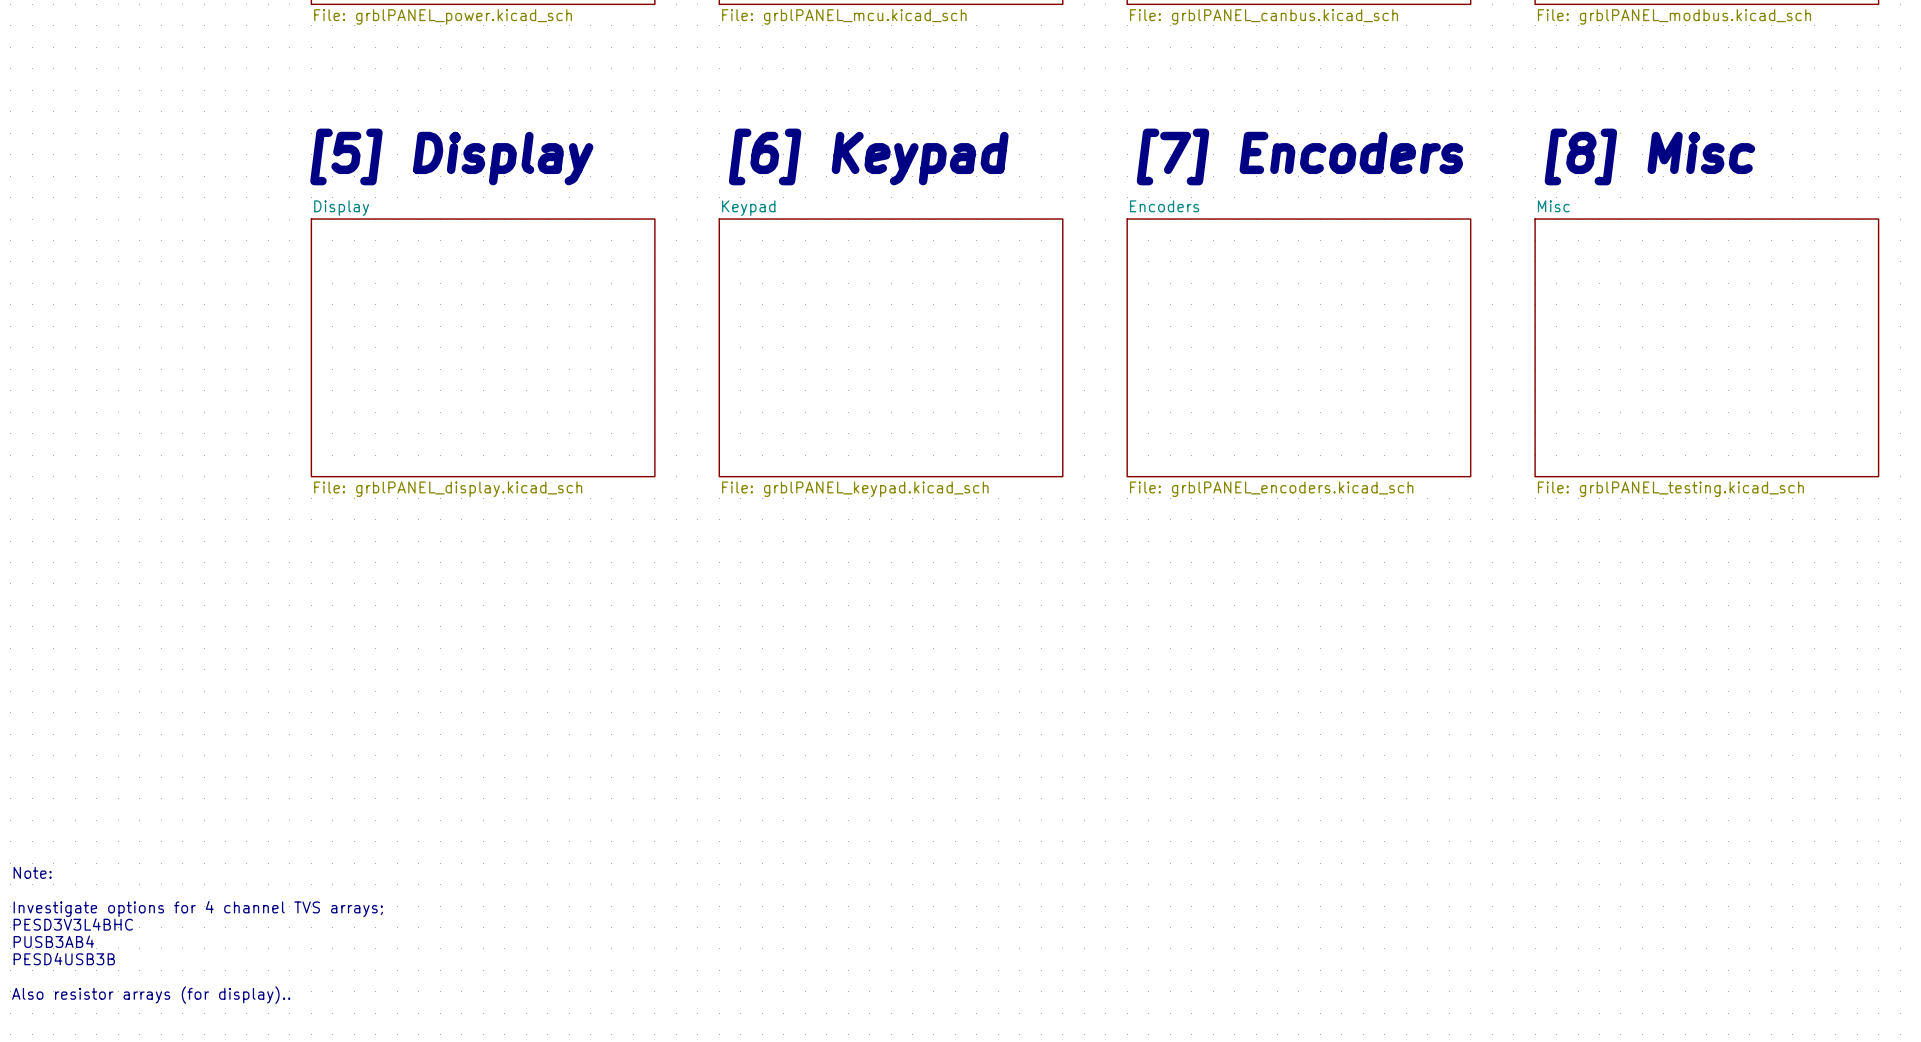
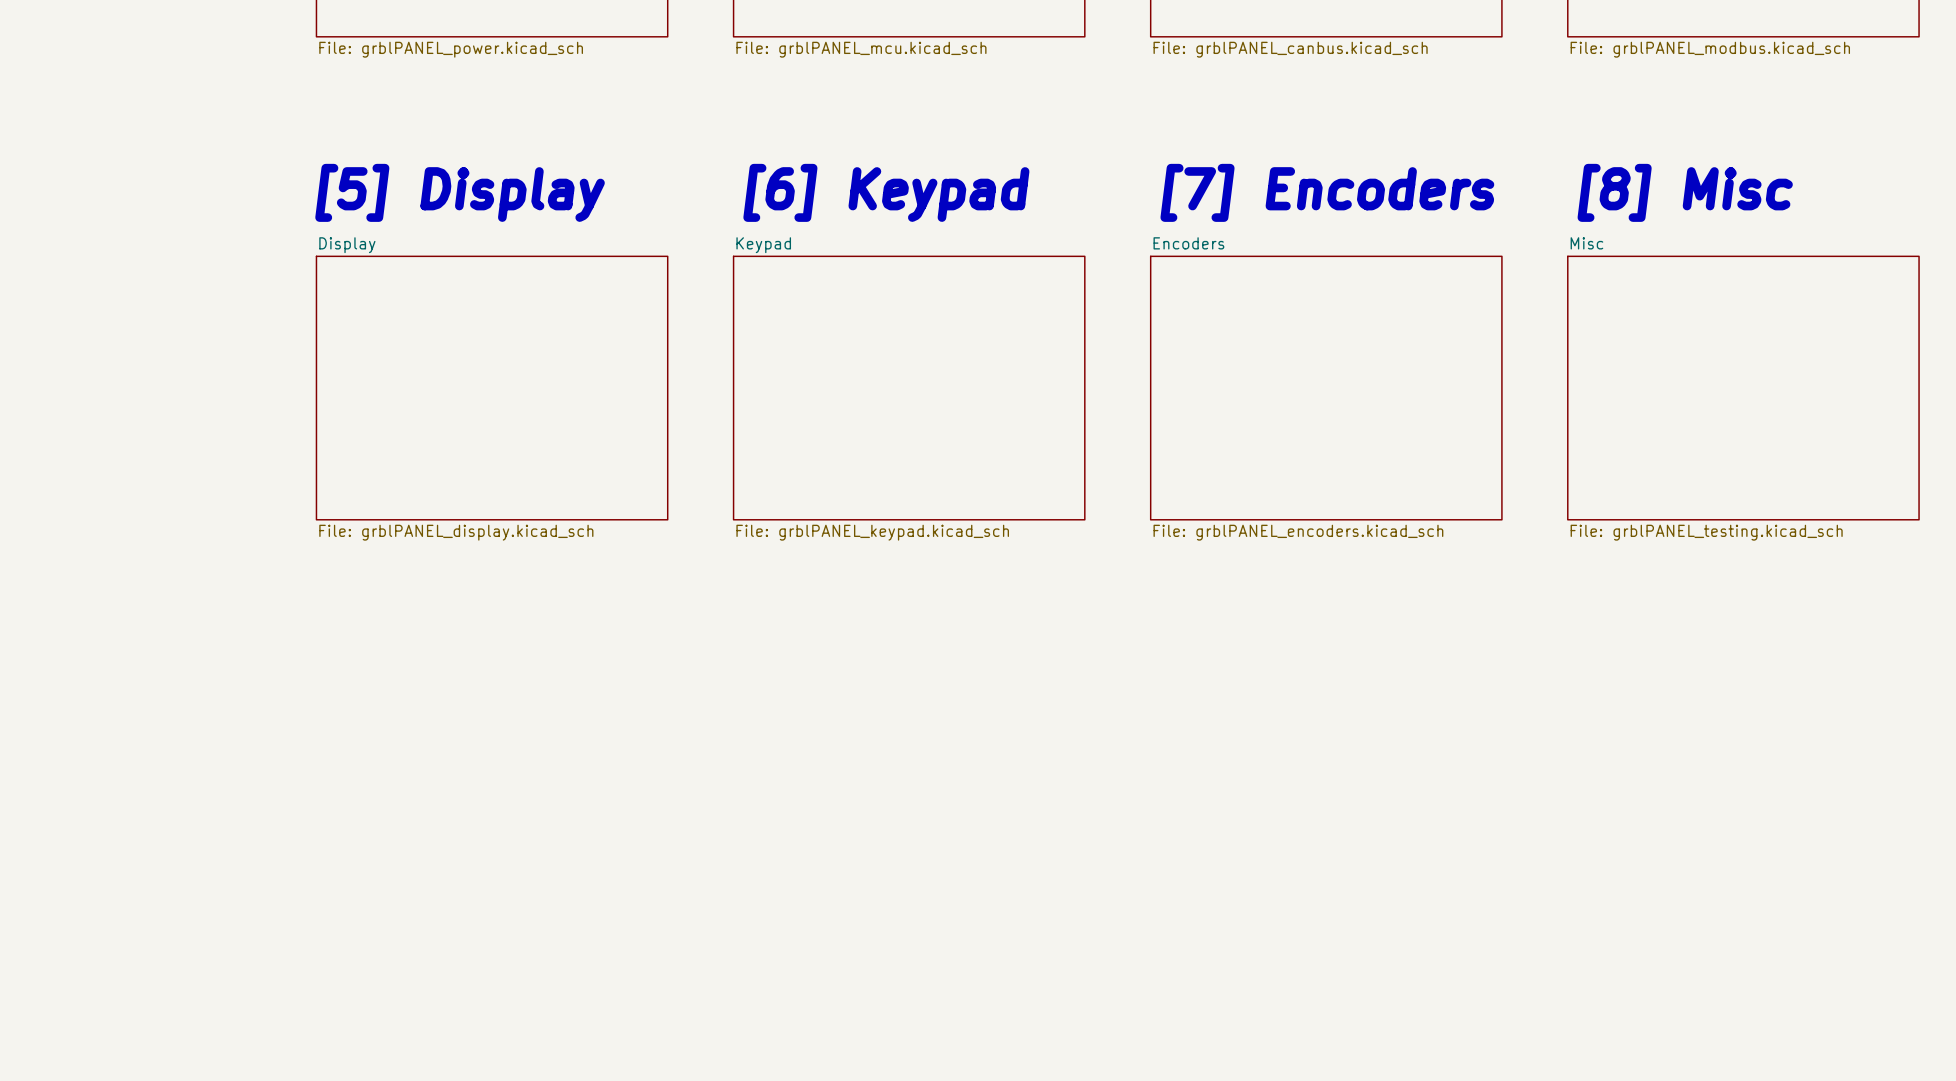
text: Note: (32, 872) -> none
text: Investigate options for 4 channel TVS arrays; (198, 908) -> none
text: PESD3V3L4BHC (73, 924) -> none
text: PUSB3AB4 (53, 941) -> none
text: PESD4USB3B (64, 959) -> none
text: Also resistor arrays (for display).. (151, 995) -> none

